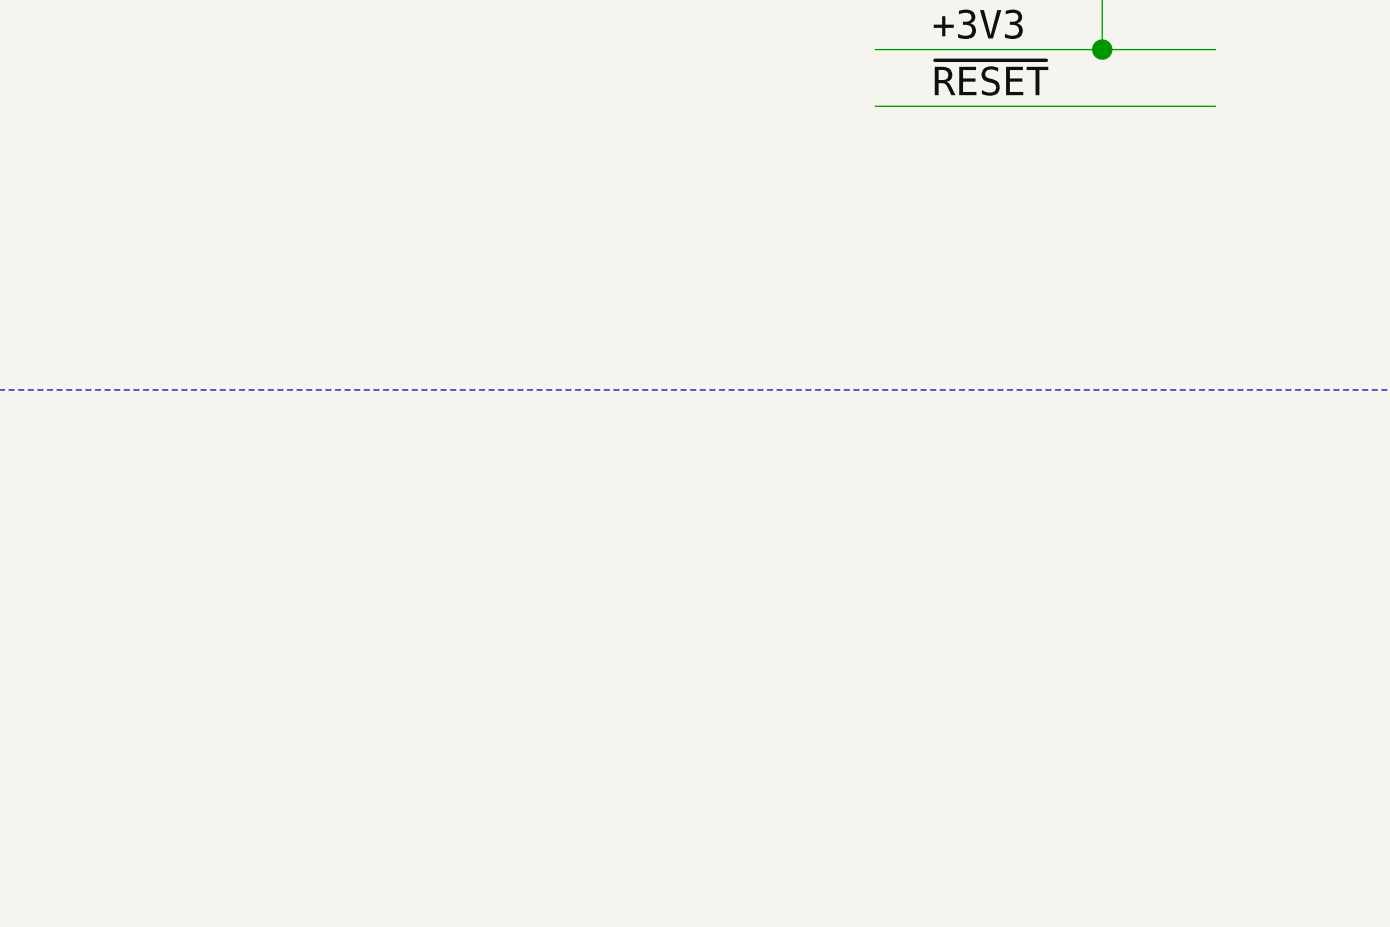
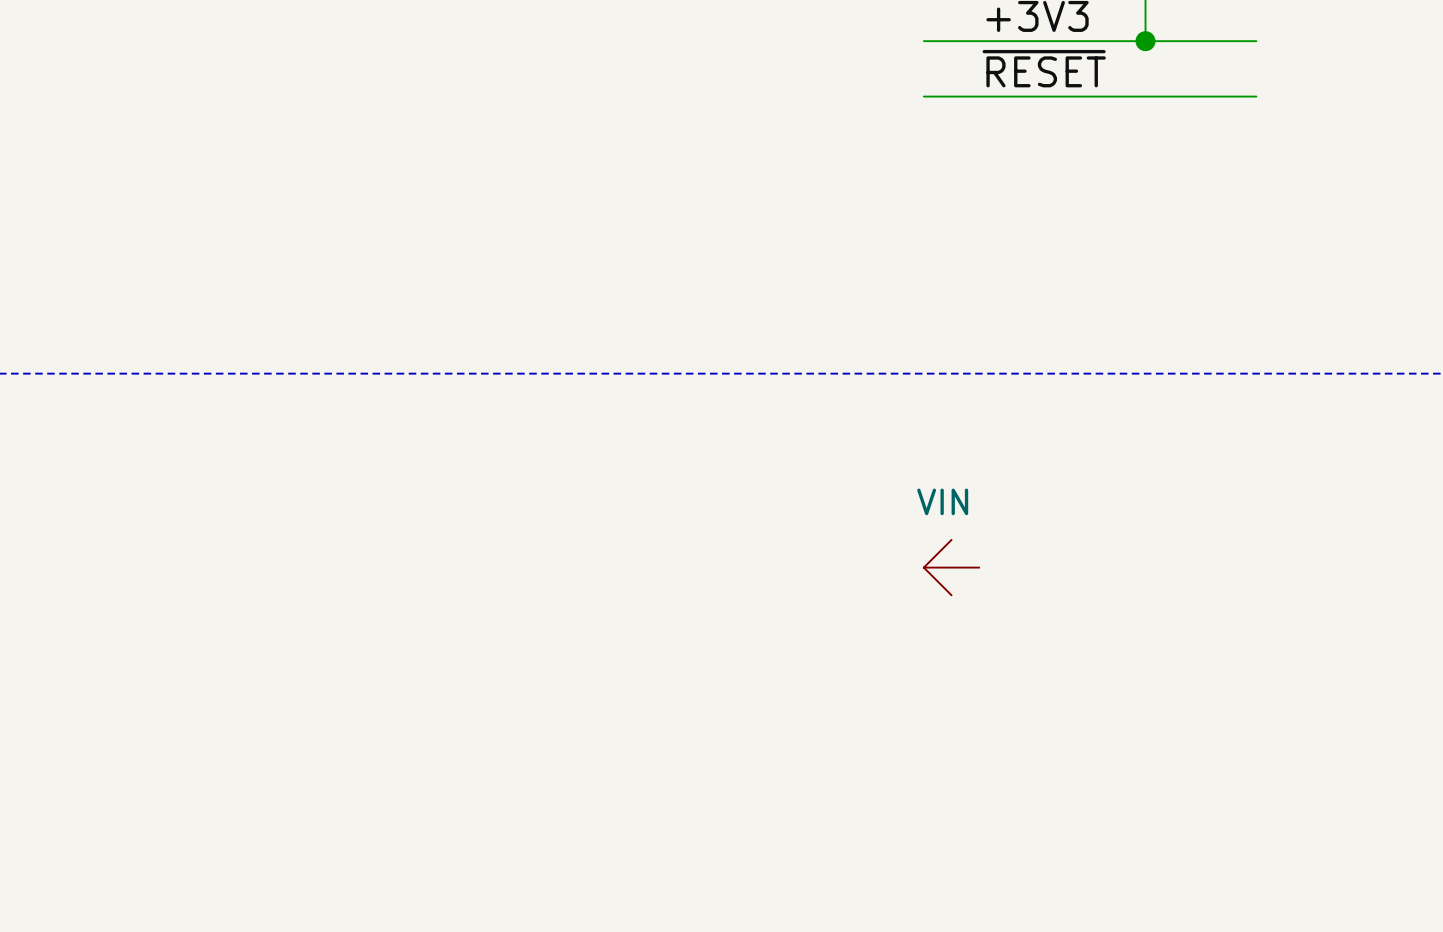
power symbol: none -> VIN (951, 567)

